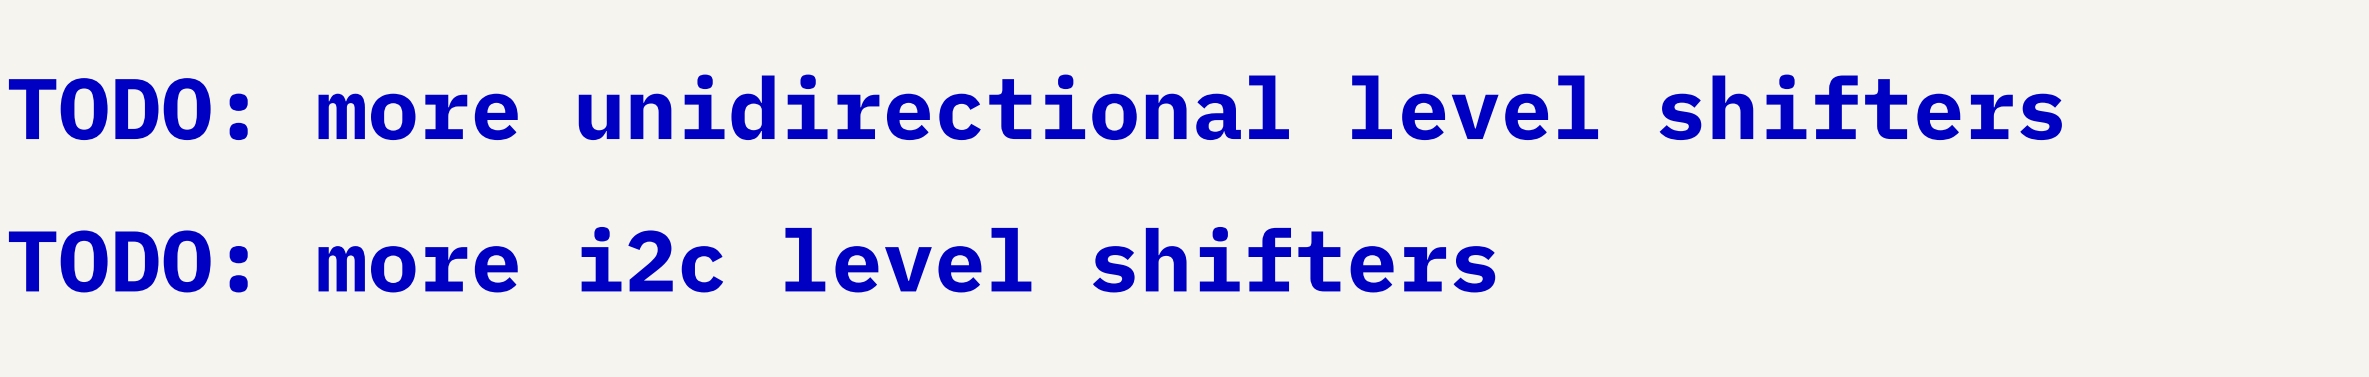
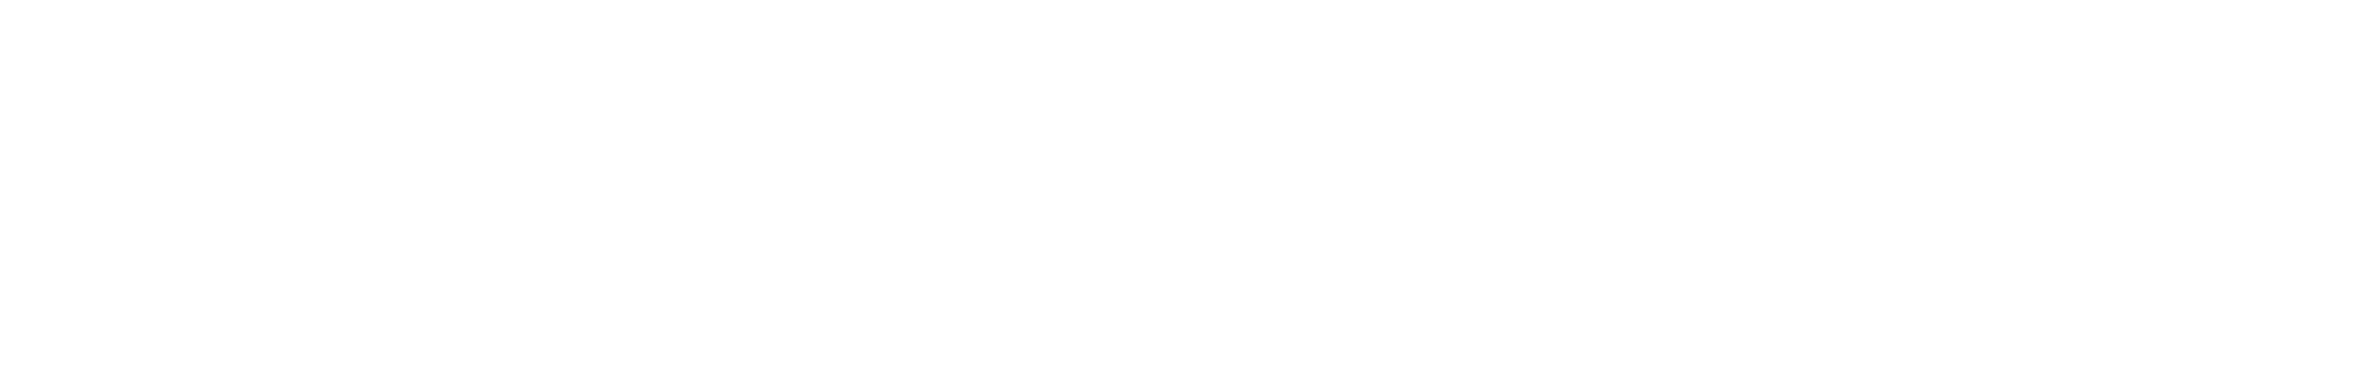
text: TODO: more unidirectional level shifters (1035, 107) -> none
text: TODO: more i2c level shifters (752, 259) -> none

